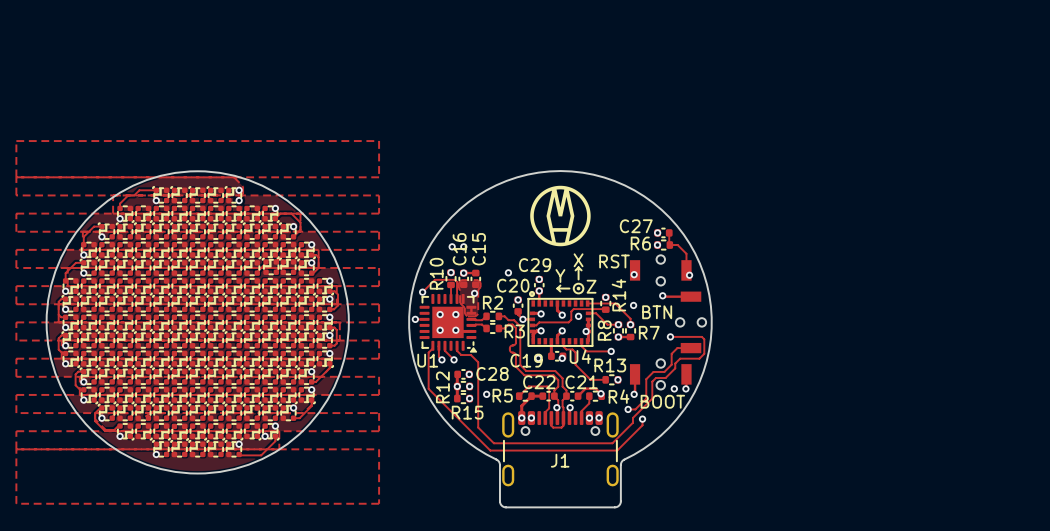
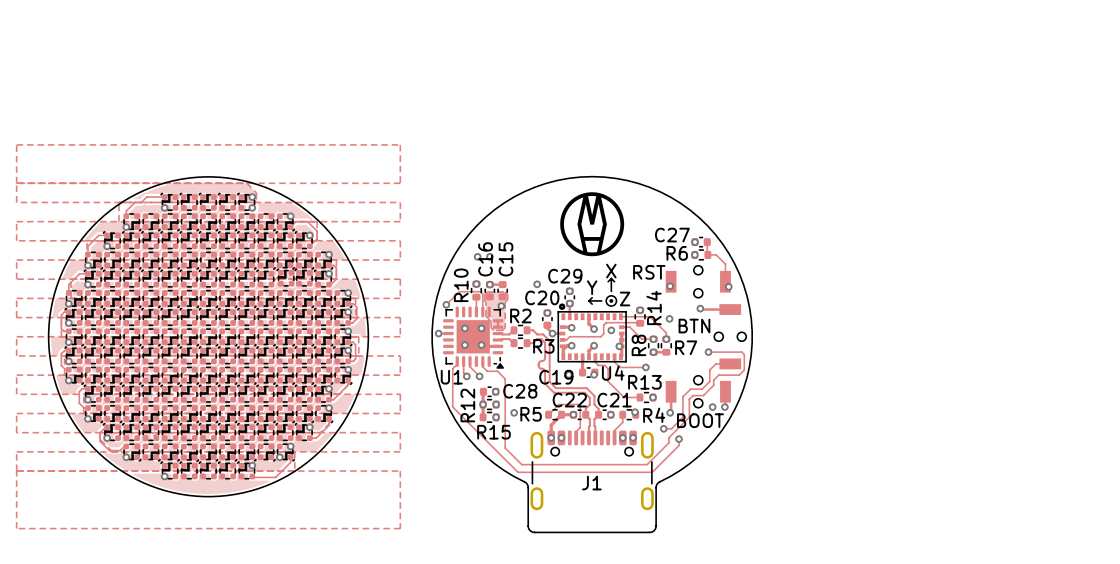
track: (600, 393) (595, 388) (585, 388) (578, 396) -> none
via: none -> (573, 414)
via: none -> (610, 414)
via: (556, 407) -> none
via: (570, 407) -> none
track: (551, 418) (553, 427) (561, 427) (563, 418) -> none

